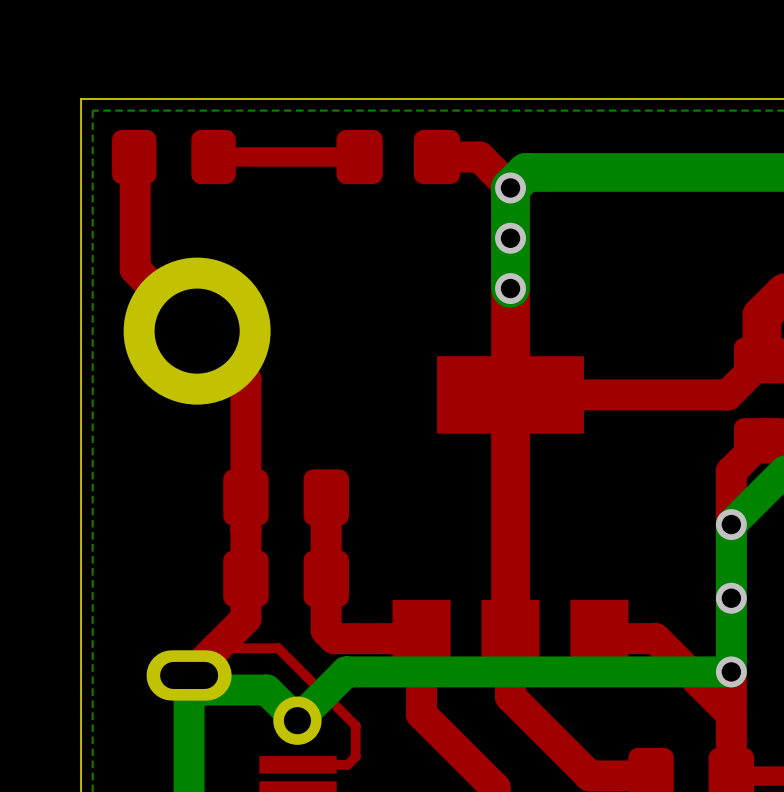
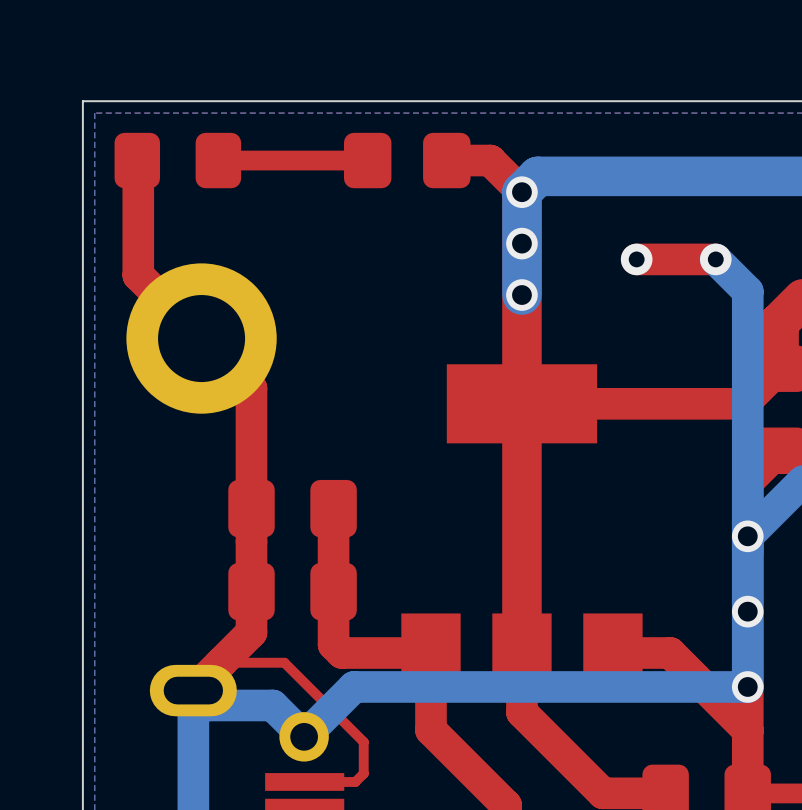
via: none -> (636, 259)
top track: none -> (715, 259) (636, 259)
bottom track: none -> (715, 259) (747, 291) (747, 536)
via: none -> (715, 259)

